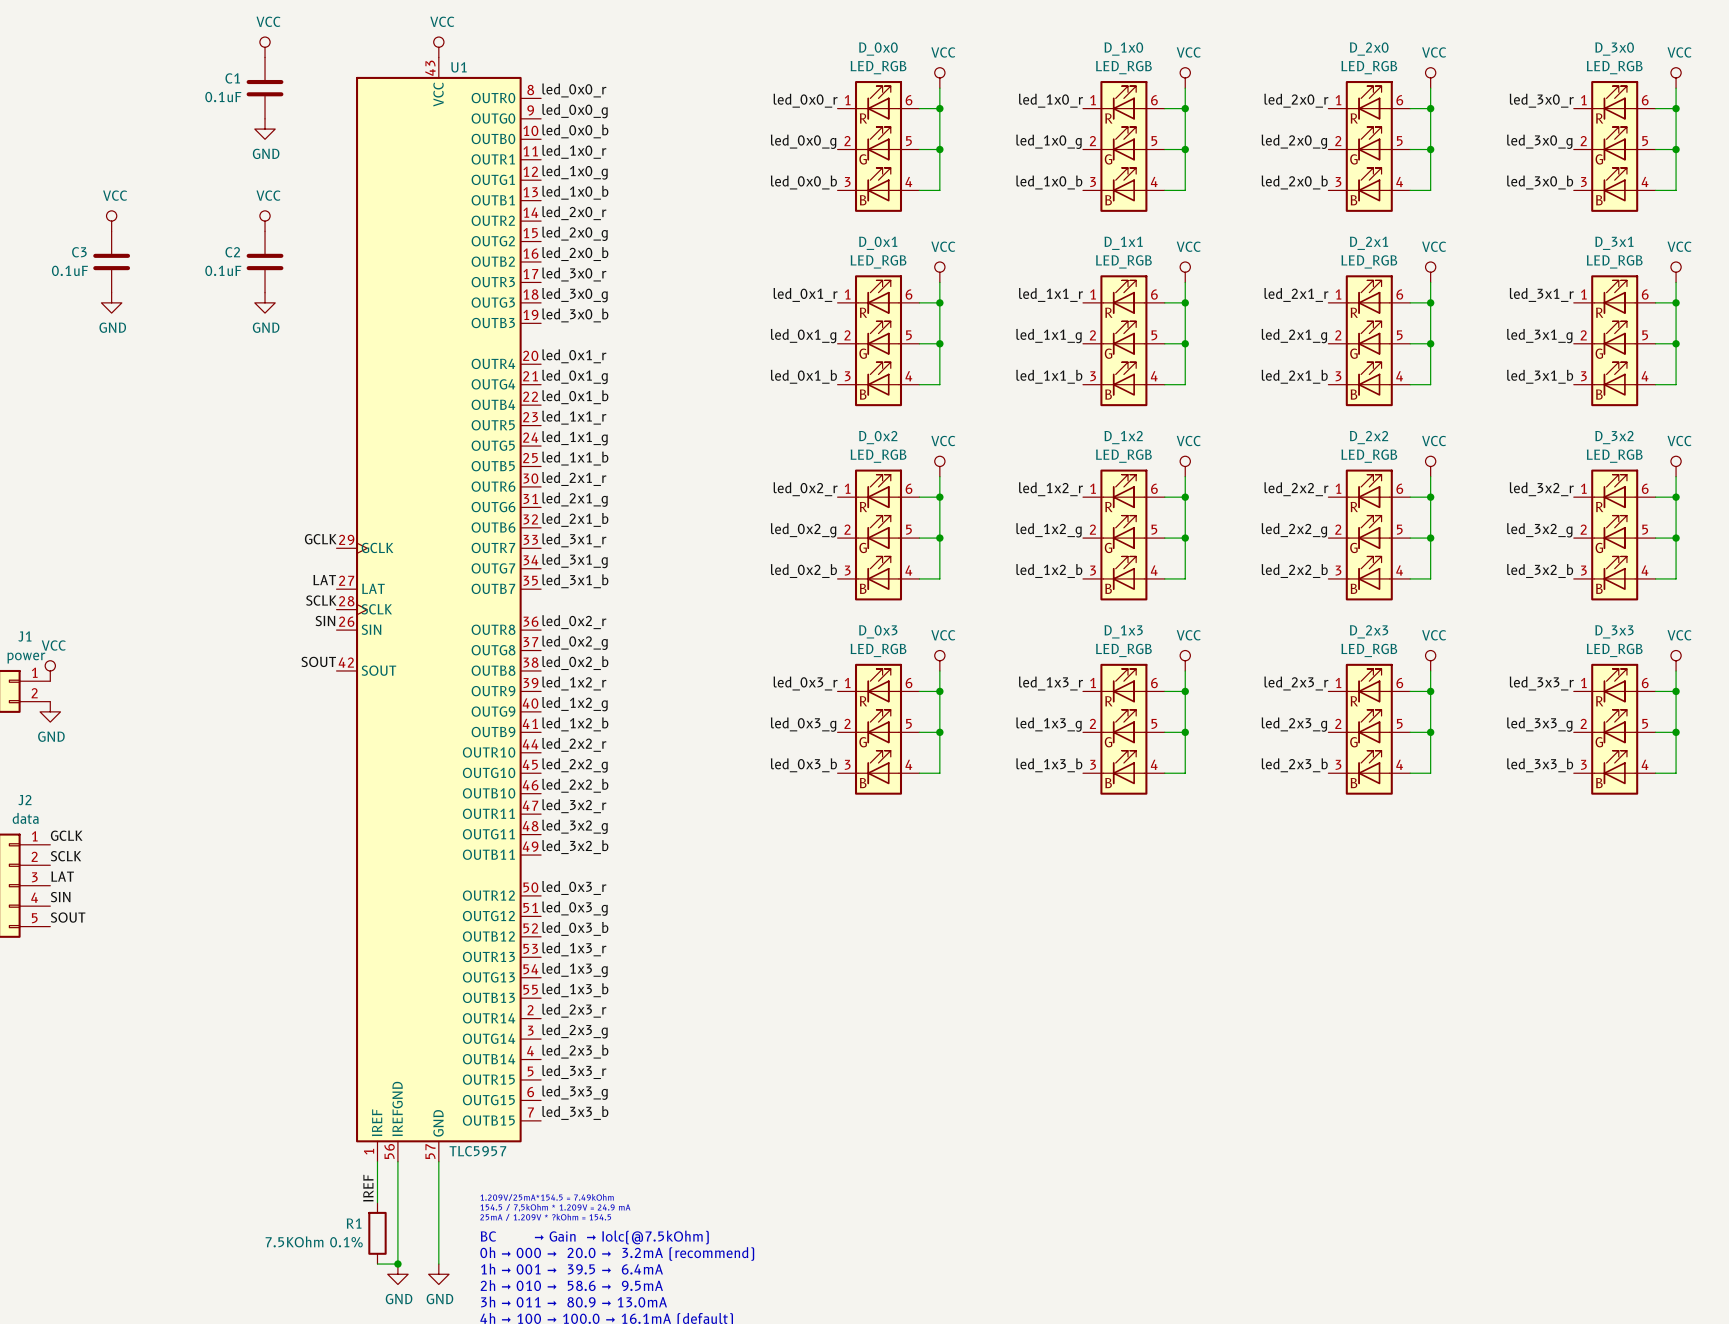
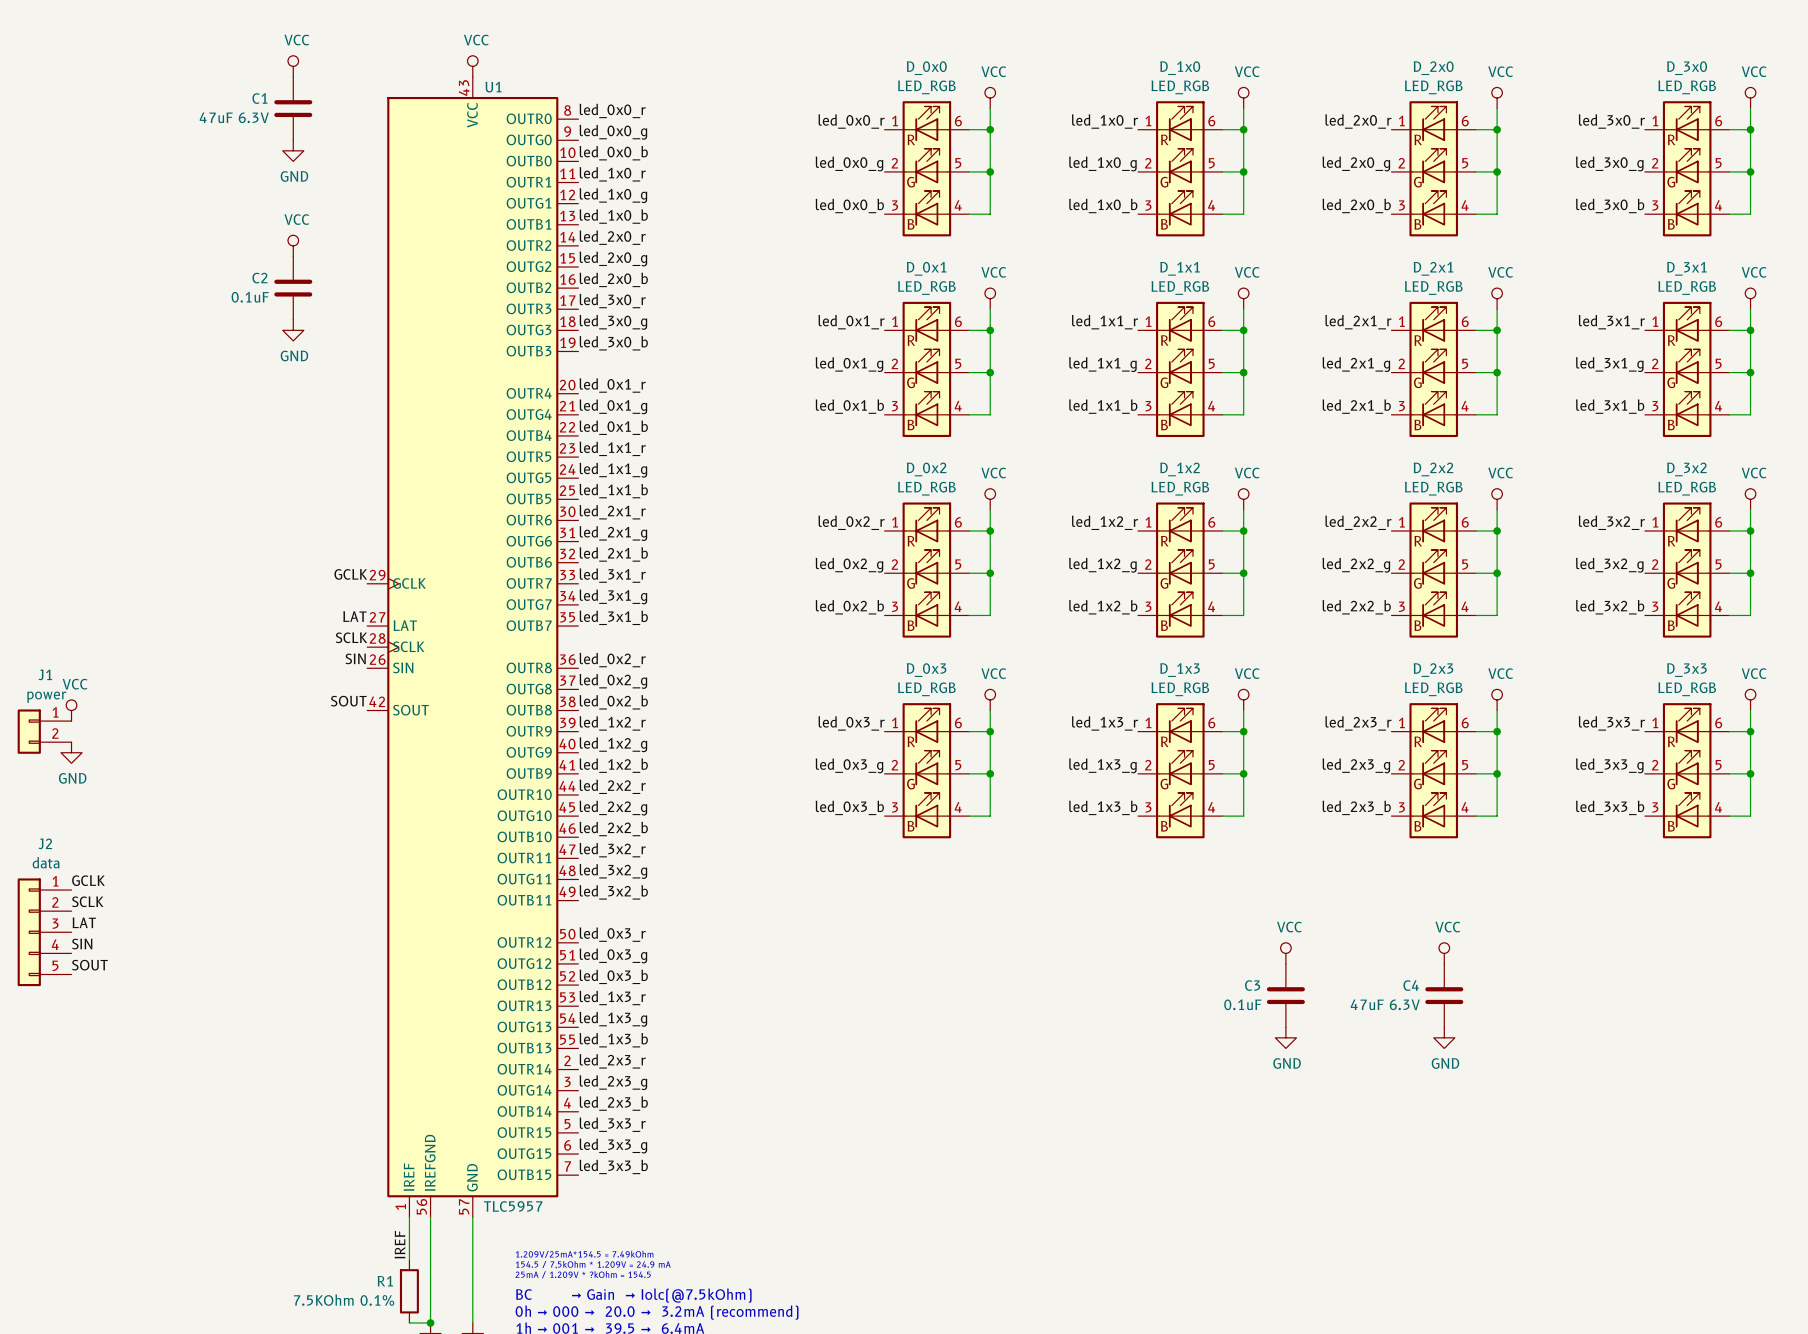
C1 value: 0.1uF (223, 97) -> 47uF 6.3V (234, 117)
power symbol: VCC (111, 221) -> none
C3 position: (111, 261) -> (1285, 995)
power symbol: GND (111, 302) -> none
power symbol: none -> VCC (1285, 953)
power symbol: none -> VCC (1444, 953)
C4: none -> 47uF 6.3V (1444, 995)
power symbol: none -> GND (1285, 1037)
power symbol: none -> GND (1444, 1037)

